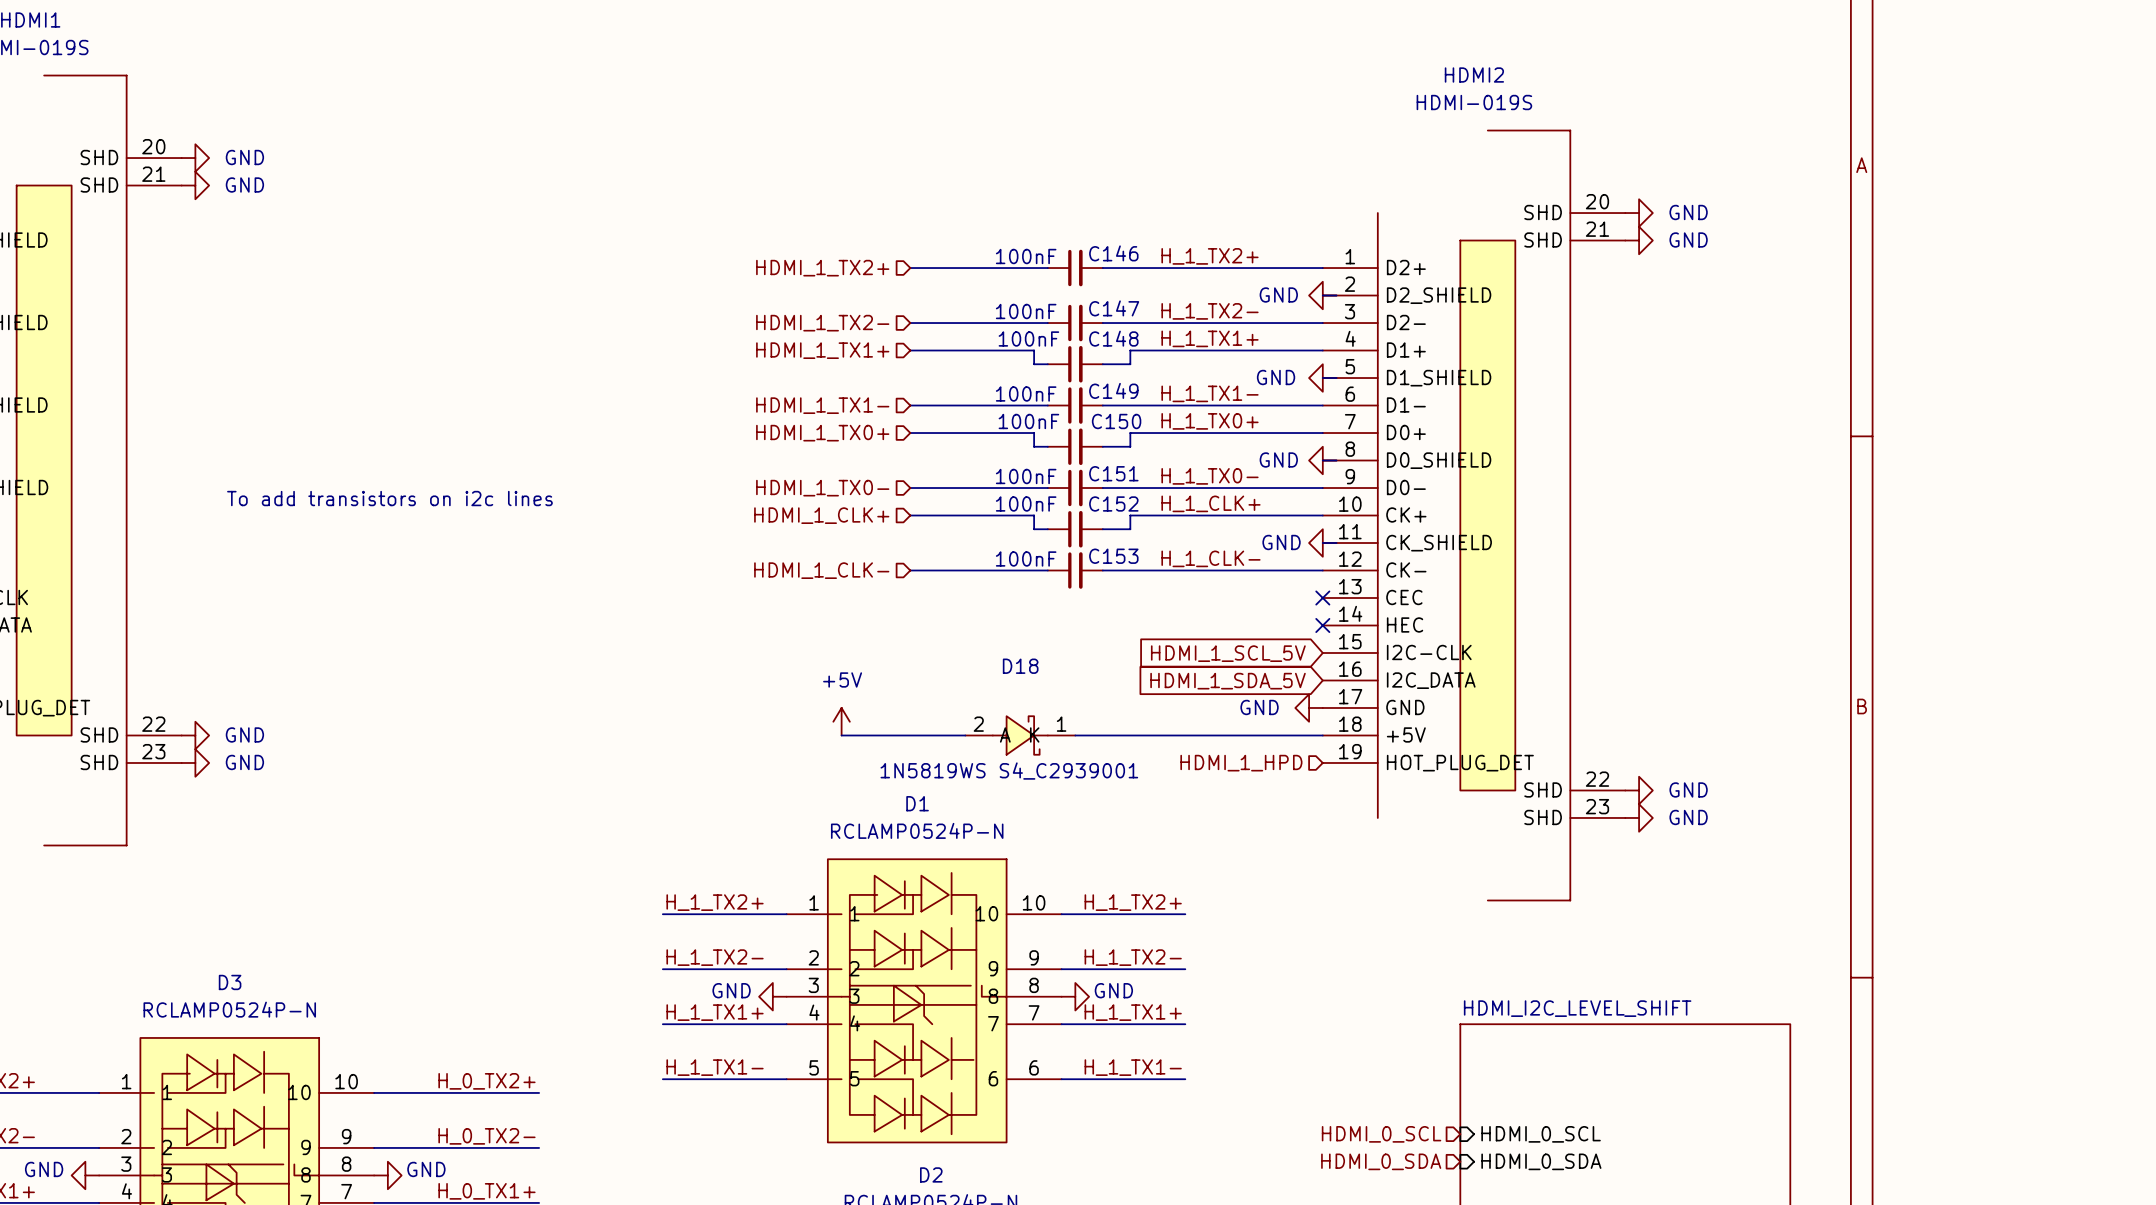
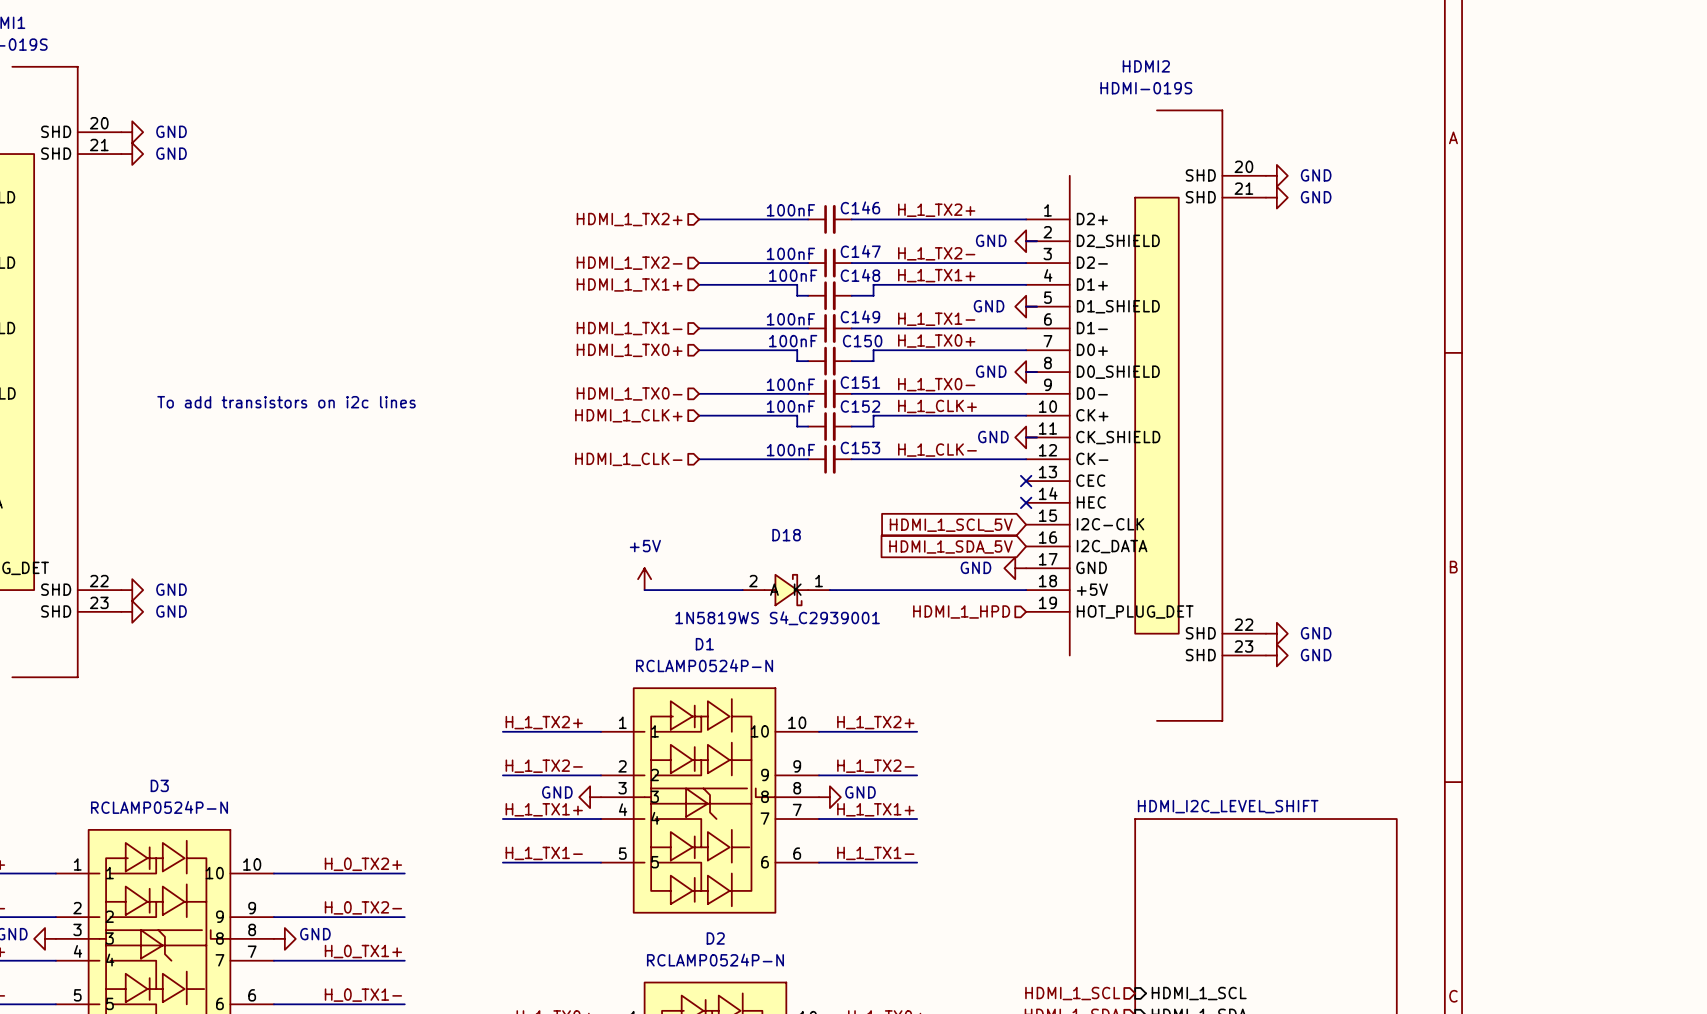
hierarchical label: HDMI_0_SCL (1381, 1134) -> none
sheet pin: HDMI_0_SCL (1541, 1134) -> none
hierarchical label: HDMI_0_SDA (1381, 1161) -> none
sheet pin: HDMI_0_SDA (1541, 1161) -> none

